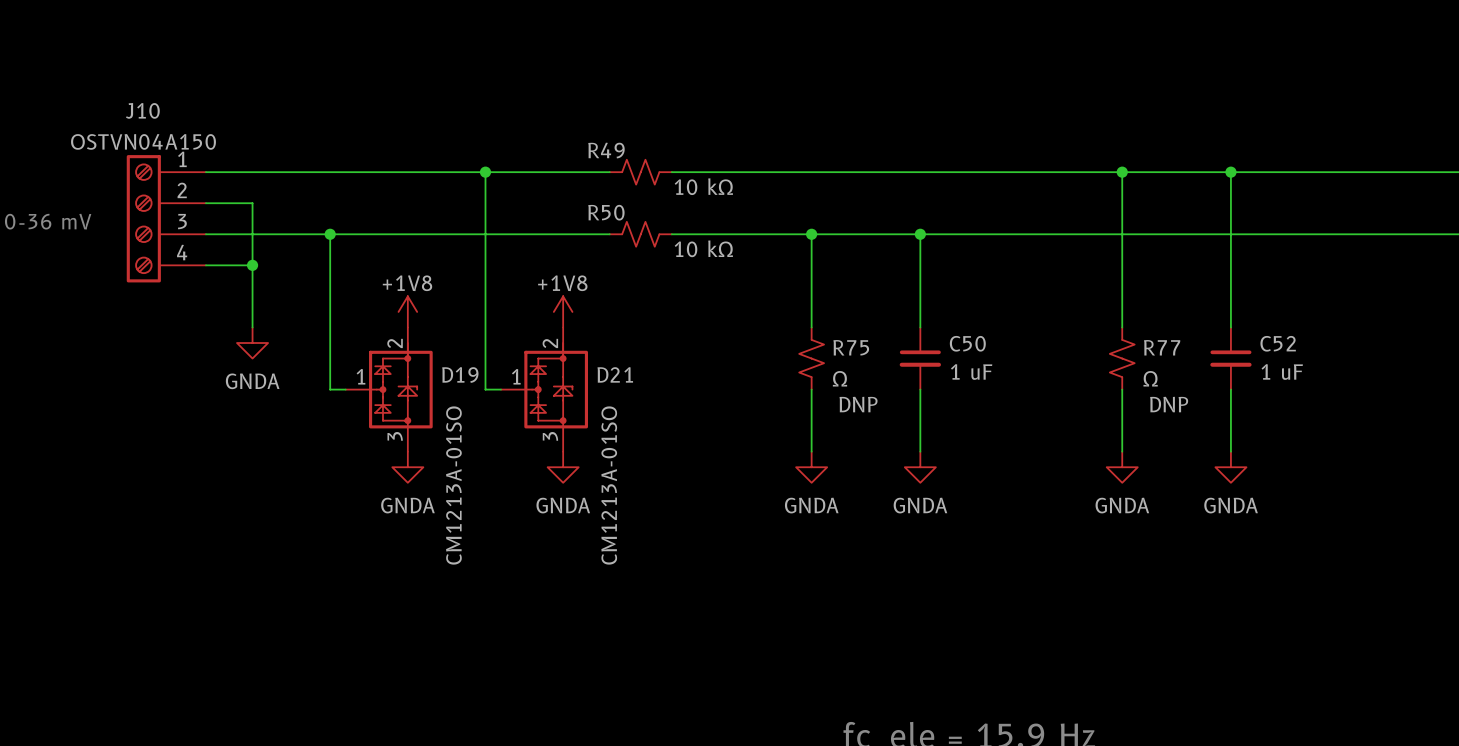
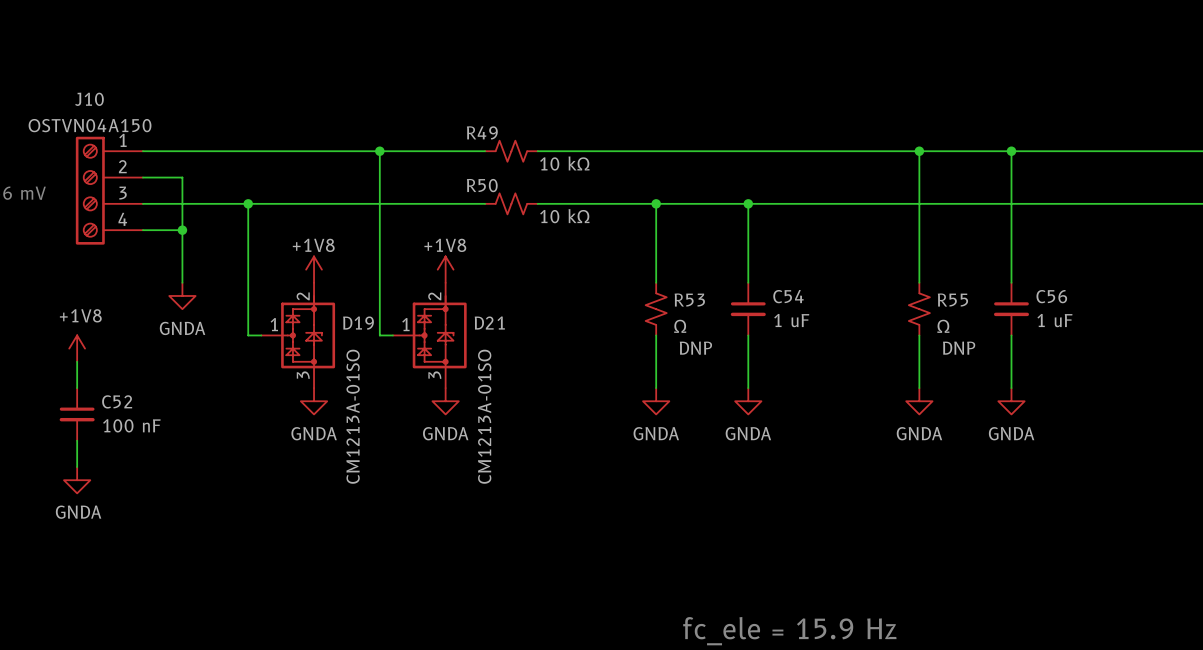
C50 name: C50 (967, 343) -> C54 (788, 296)
C52 name: C52 (1278, 343) -> C56 (1051, 296)
R75 name: R75 (851, 347) -> R53 (689, 300)
R77 name: R77 (1162, 347) -> R55 (952, 300)
power symbol: none -> +1V8 (77, 348)
wire: none -> (77, 361) (77, 388)
C52: none -> 100 nF (77, 414)
wire: none -> (77, 440) (77, 467)
power symbol: none -> GNDA (77, 480)

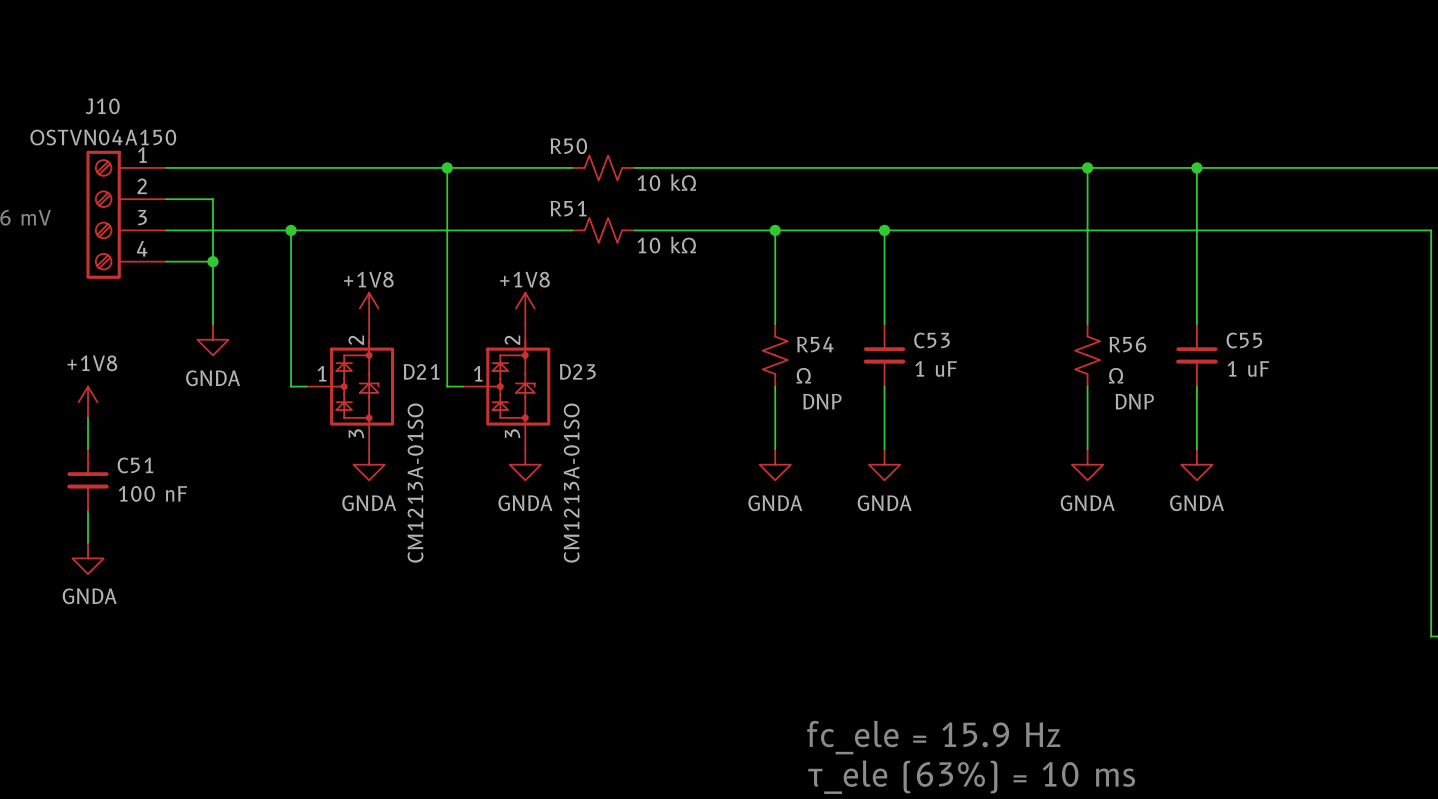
R49 name: R49 (482, 132) -> R50 (568, 146)
R50 name: R50 (482, 185) -> R51 (568, 208)
C54 name: C54 (788, 296) -> C53 (932, 340)
C56 name: C56 (1051, 296) -> C55 (1244, 340)
R53 name: R53 (689, 300) -> R54 (815, 344)
R55 name: R55 (952, 300) -> R56 (1127, 344)
D19 name: D19 (358, 323) -> D21 (421, 371)
D21 name: D21 (489, 323) -> D23 (577, 371)
C52 name: C52 (117, 401) -> C51 (135, 465)

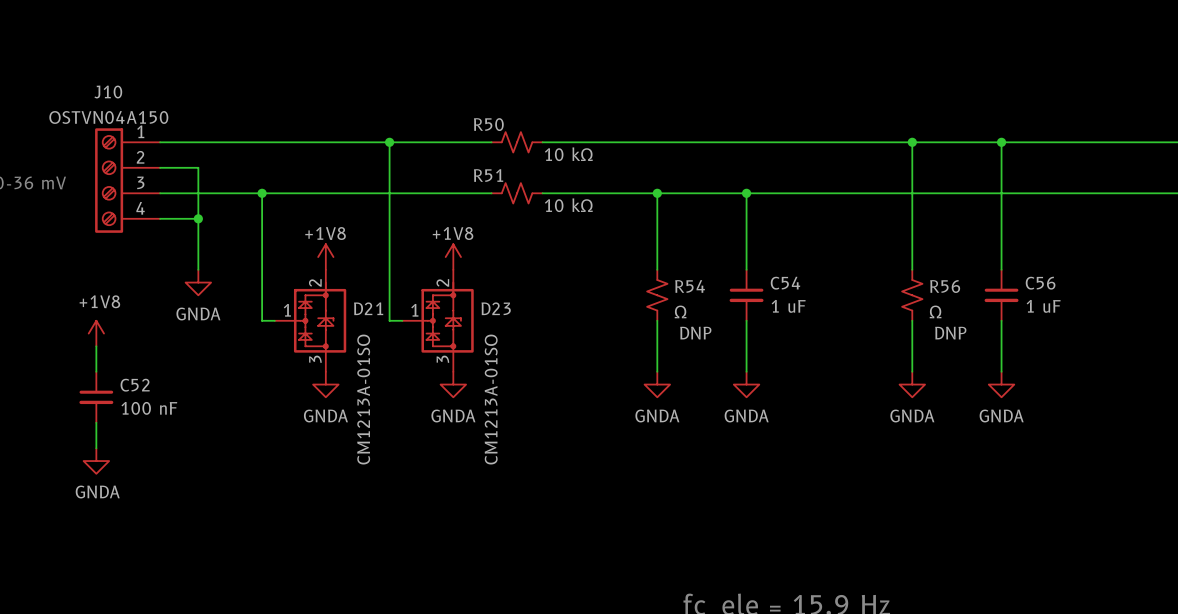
C53 name: C53 (932, 340) -> C54 (785, 283)
C55 name: C55 (1244, 340) -> C56 (1040, 283)
C51 name: C51 (135, 465) -> C52 (135, 385)

